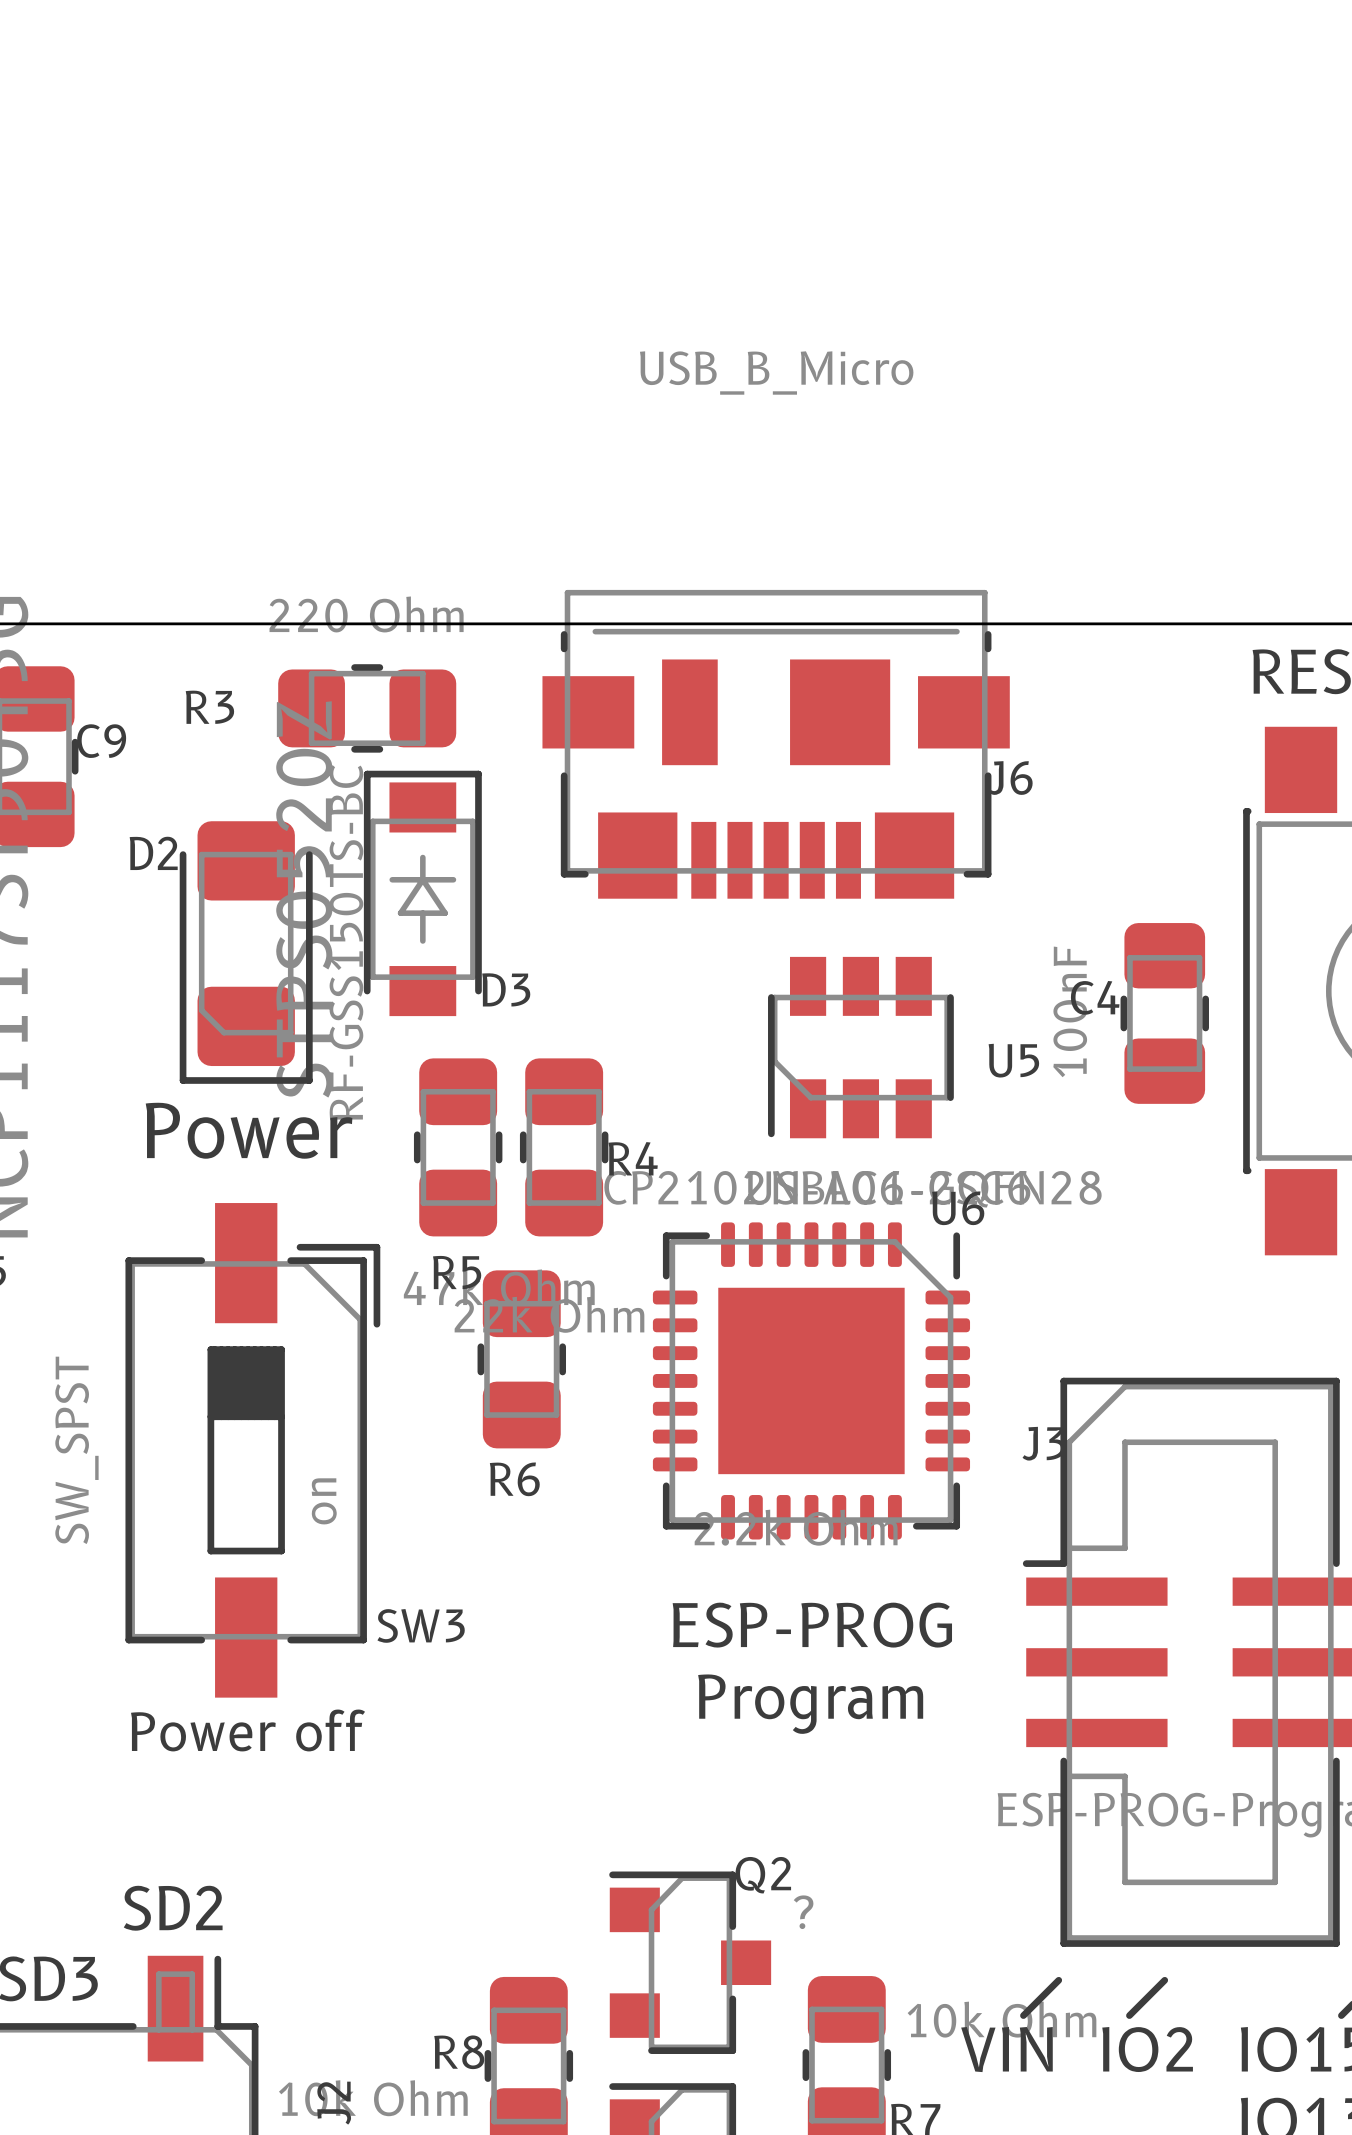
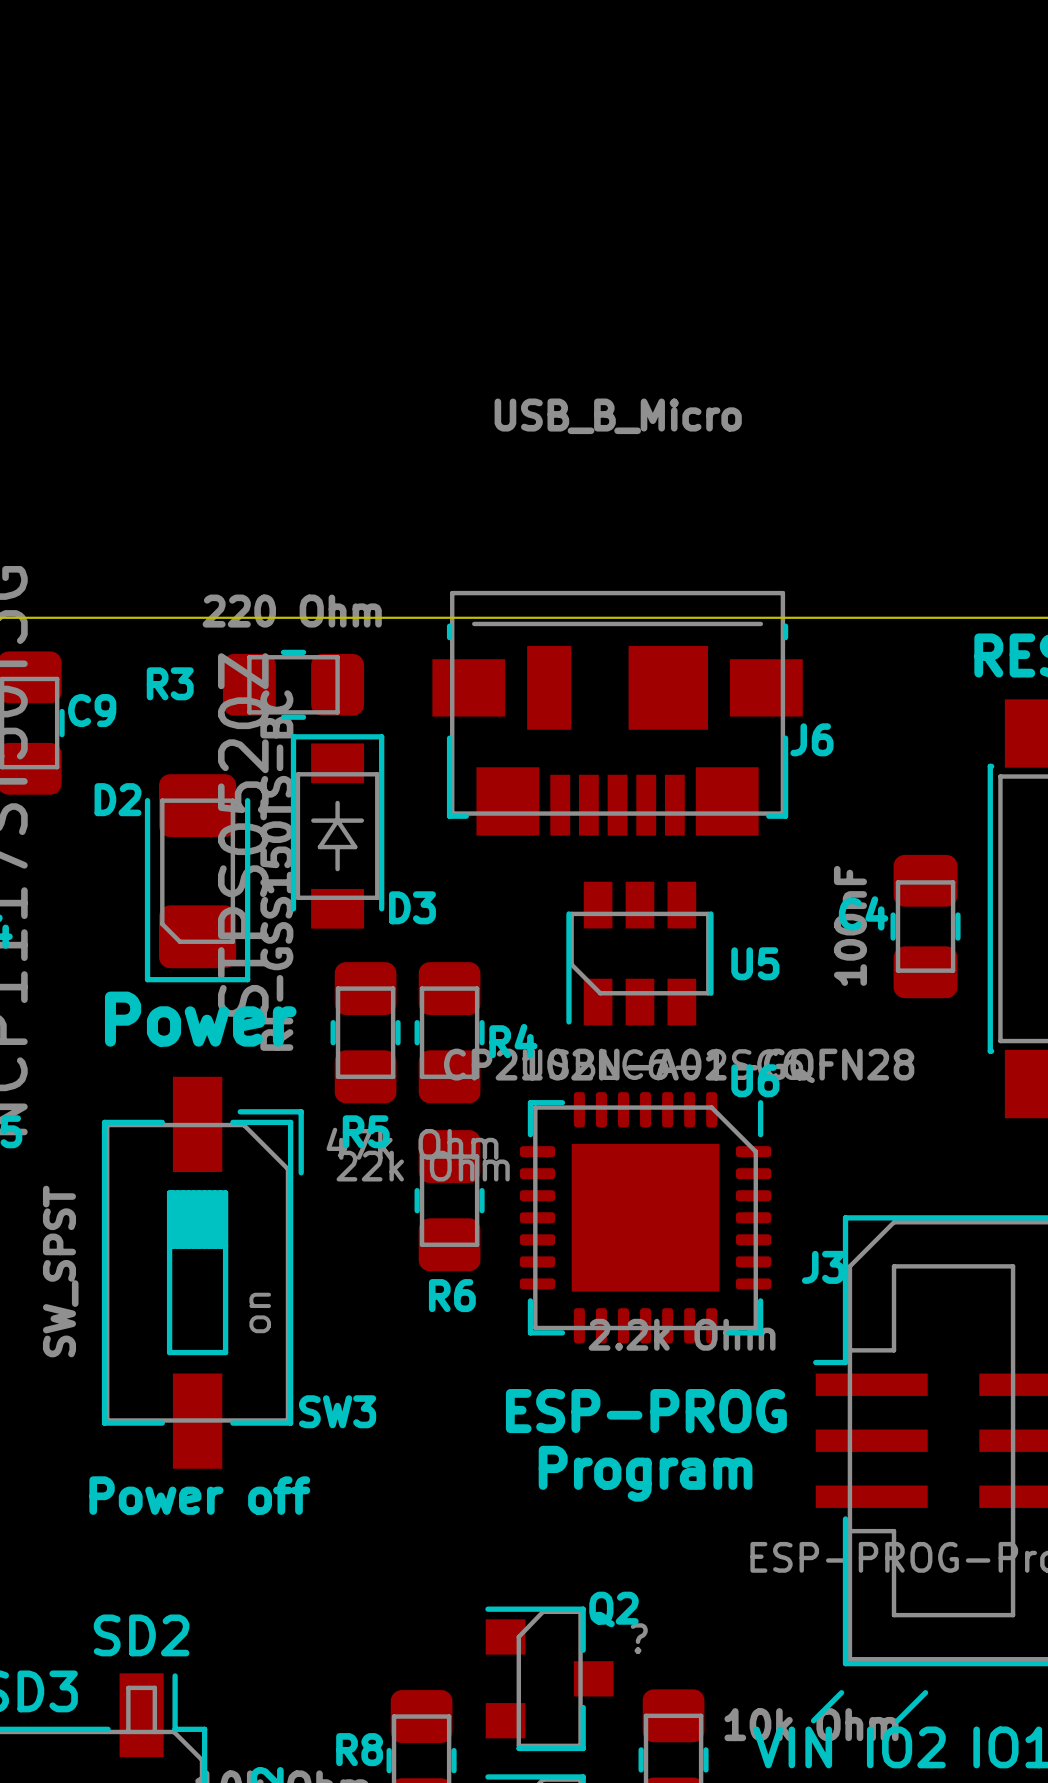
U5 position: (860, 1047) -> (639, 953)
R6 position: (521, 1359) -> (449, 1200)

